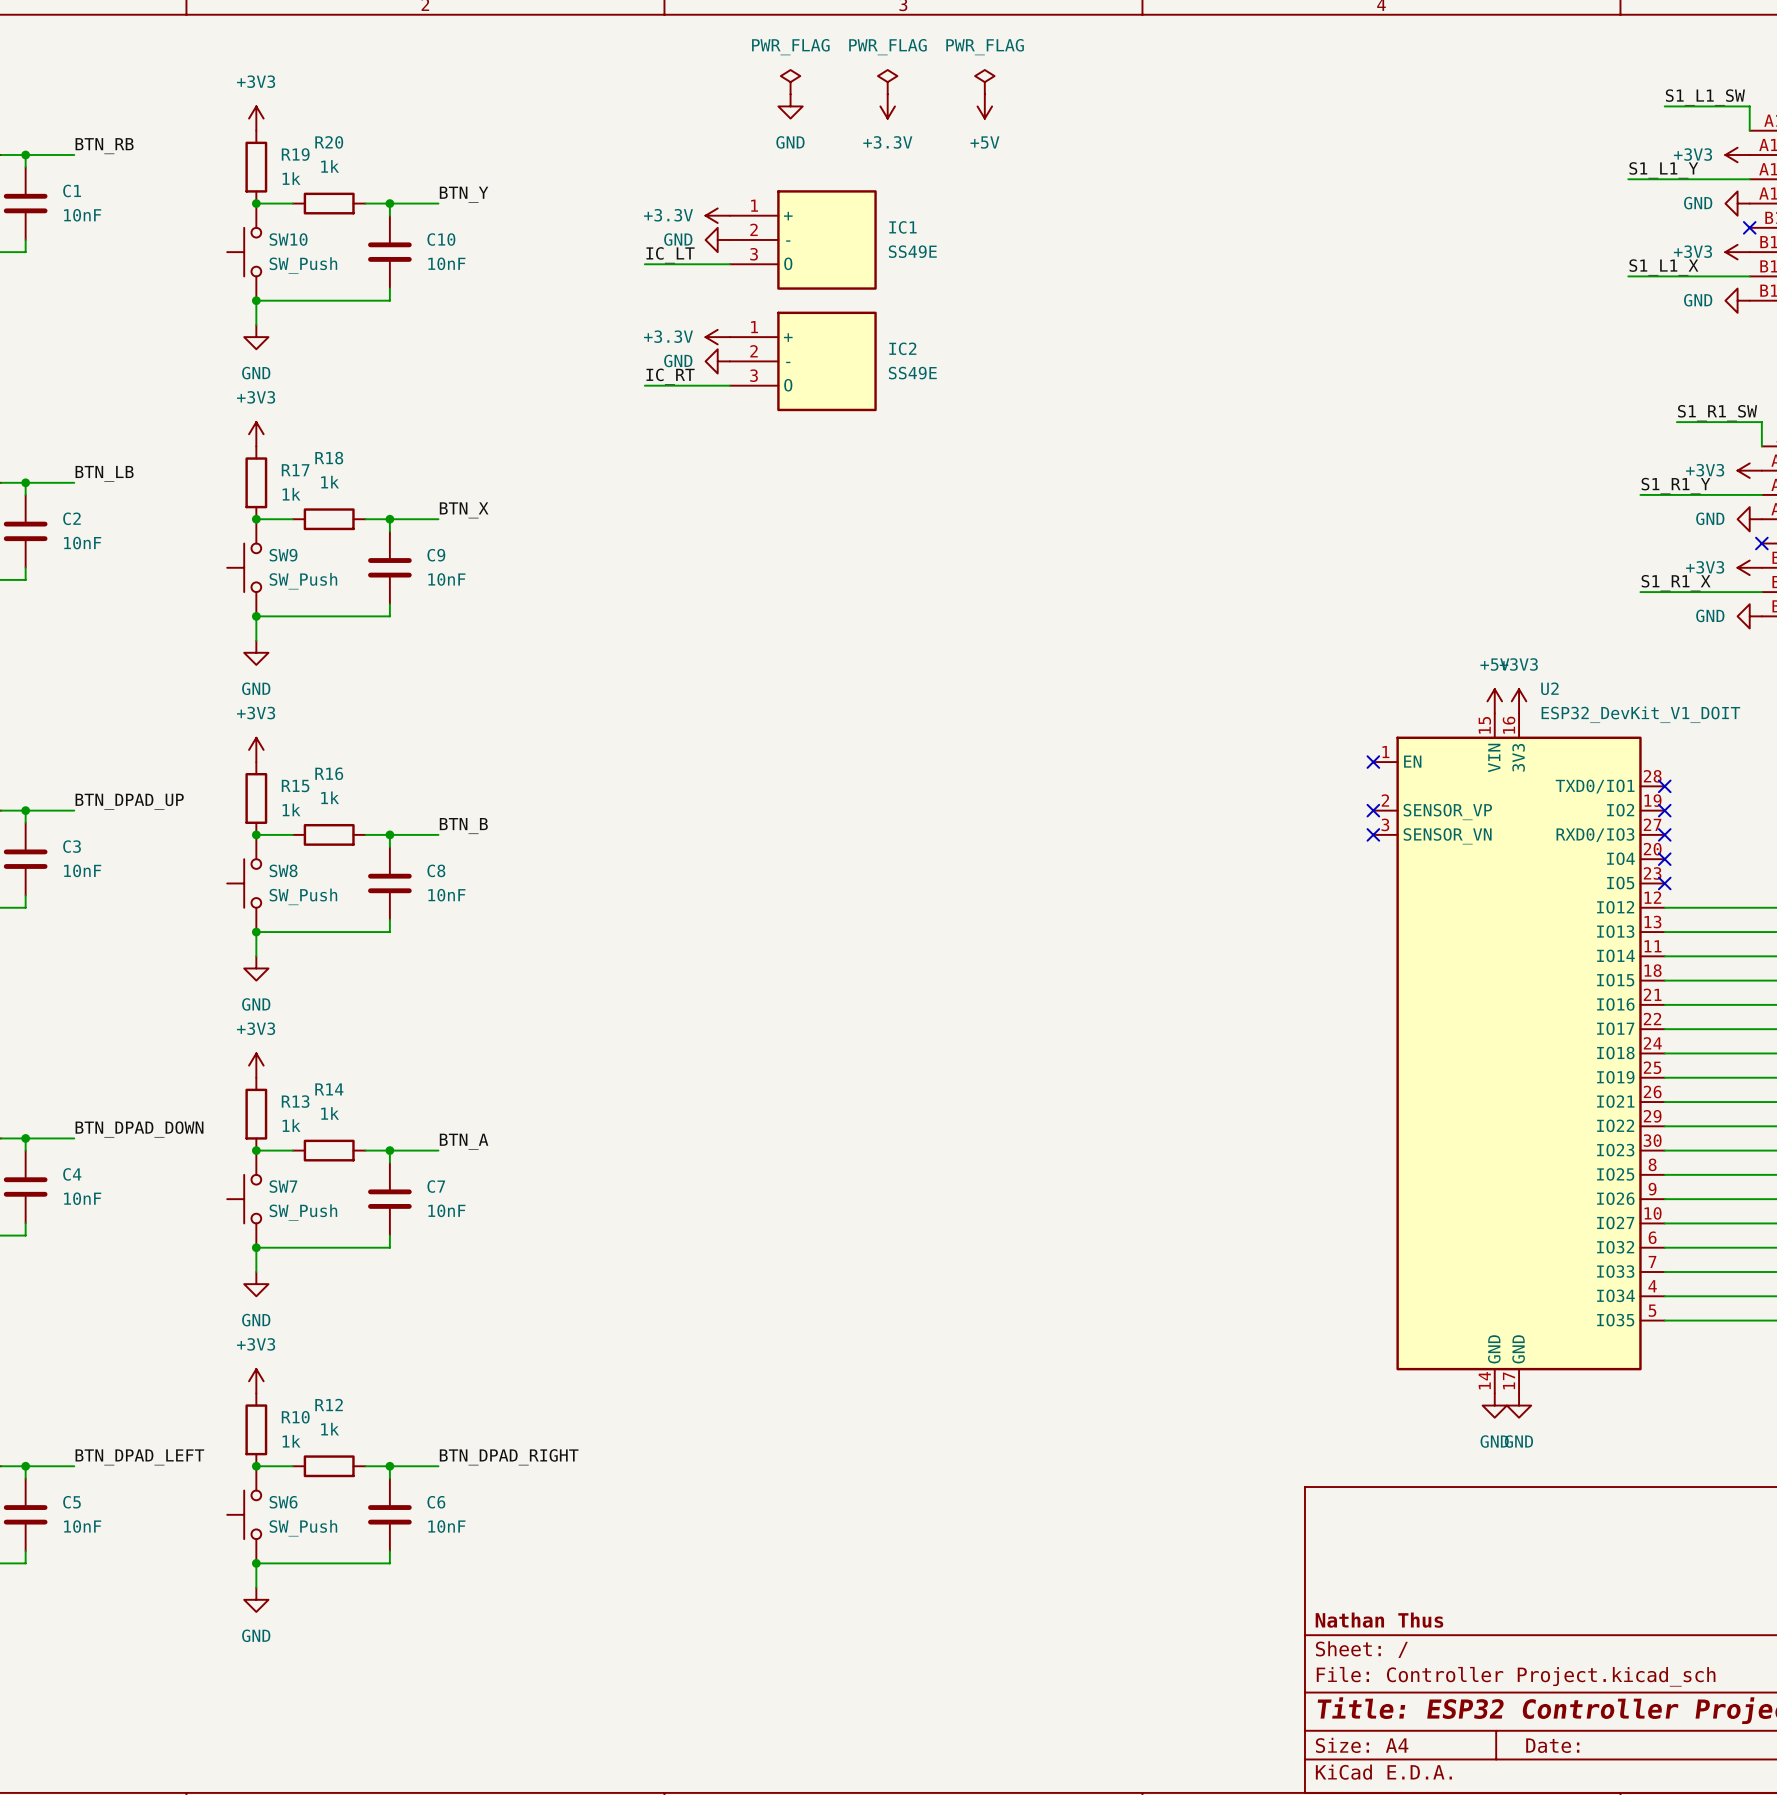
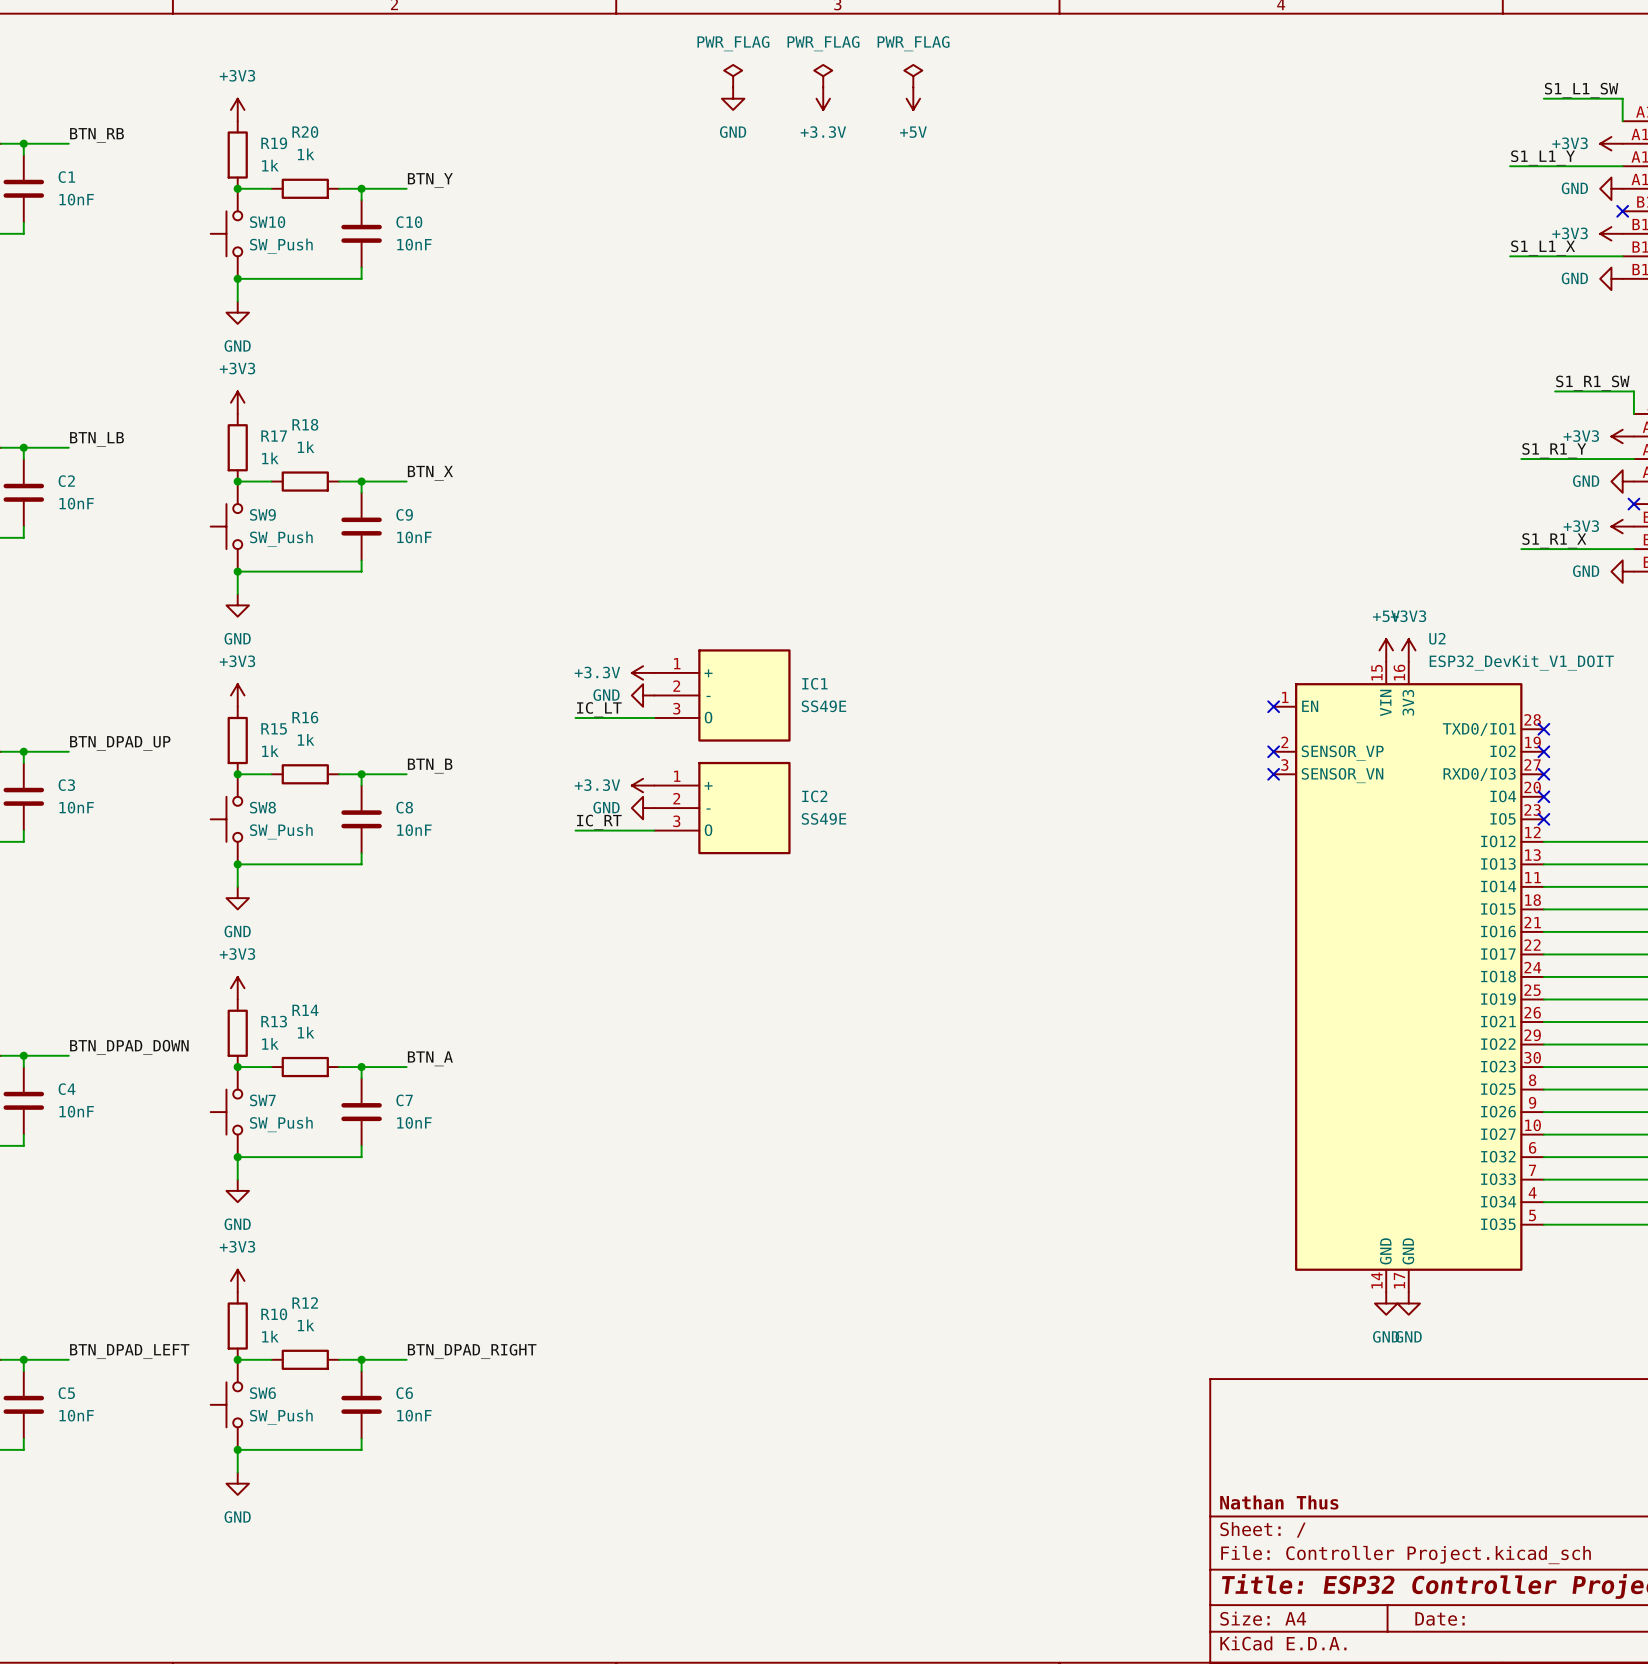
power symbol: +3.3V (717, 215) -> none
power symbol: GND (717, 239) -> none
IC1 position: (803, 239) -> (722, 695)
label: IC_LT (670, 255) -> none
wire: (644, 264) (729, 264) -> none
power symbol: +3.3V (717, 337) -> none
power symbol: GND (717, 361) -> none
IC2 position: (803, 361) -> (722, 808)
label: IC_RT (670, 376) -> none
wire: (644, 385) (729, 385) -> none
power symbol: none -> +3.3V (643, 672)
power symbol: none -> GND (643, 695)
label: none -> IC_LT (599, 709)
wire: none -> (575, 717) (654, 717)
power symbol: none -> +3.3V (643, 785)
power symbol: none -> GND (643, 808)
label: none -> IC_RT (599, 822)
wire: none -> (575, 830) (654, 830)

